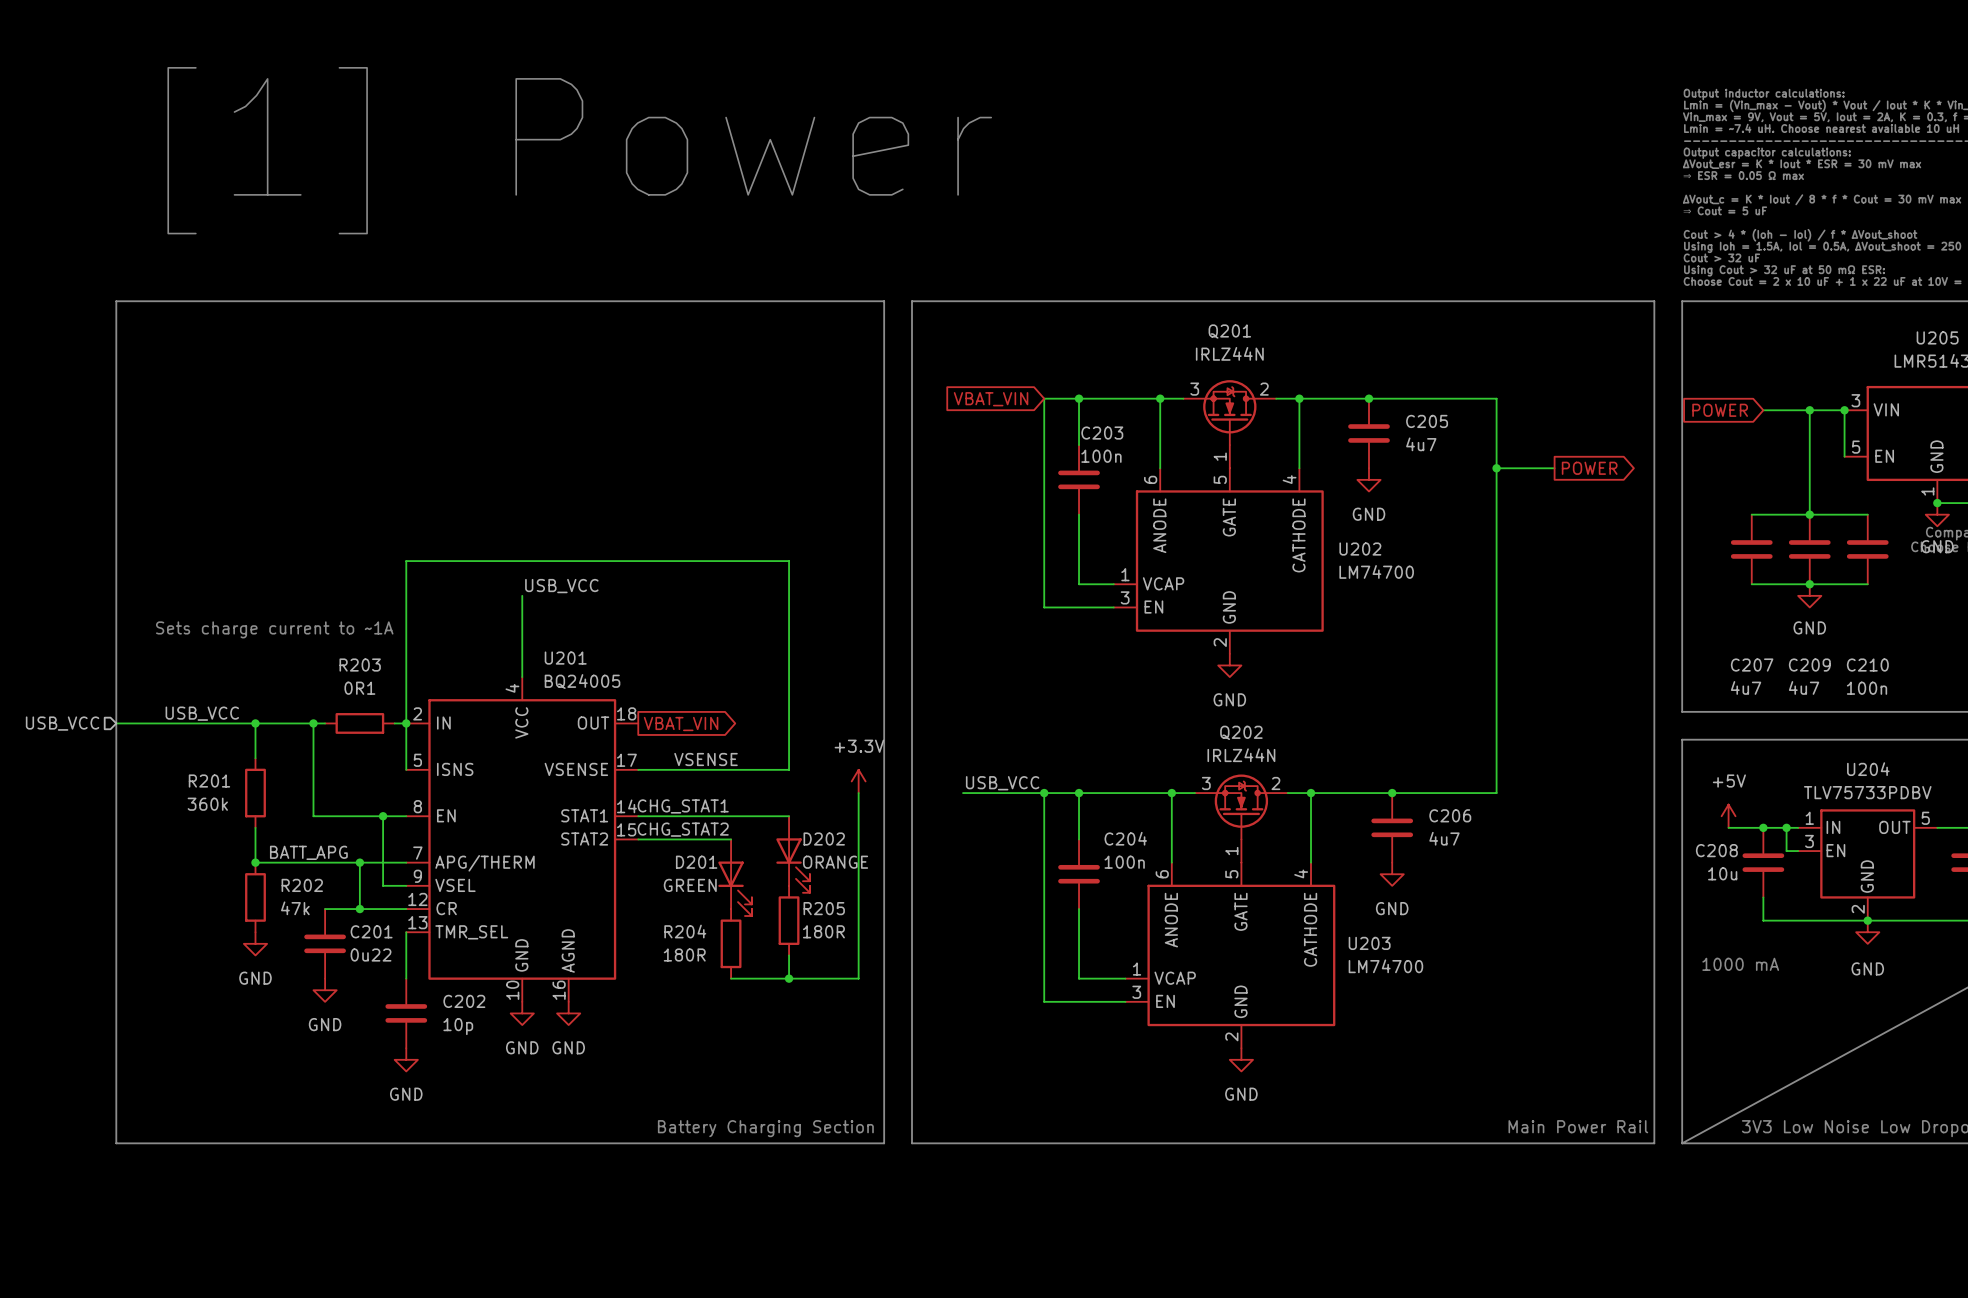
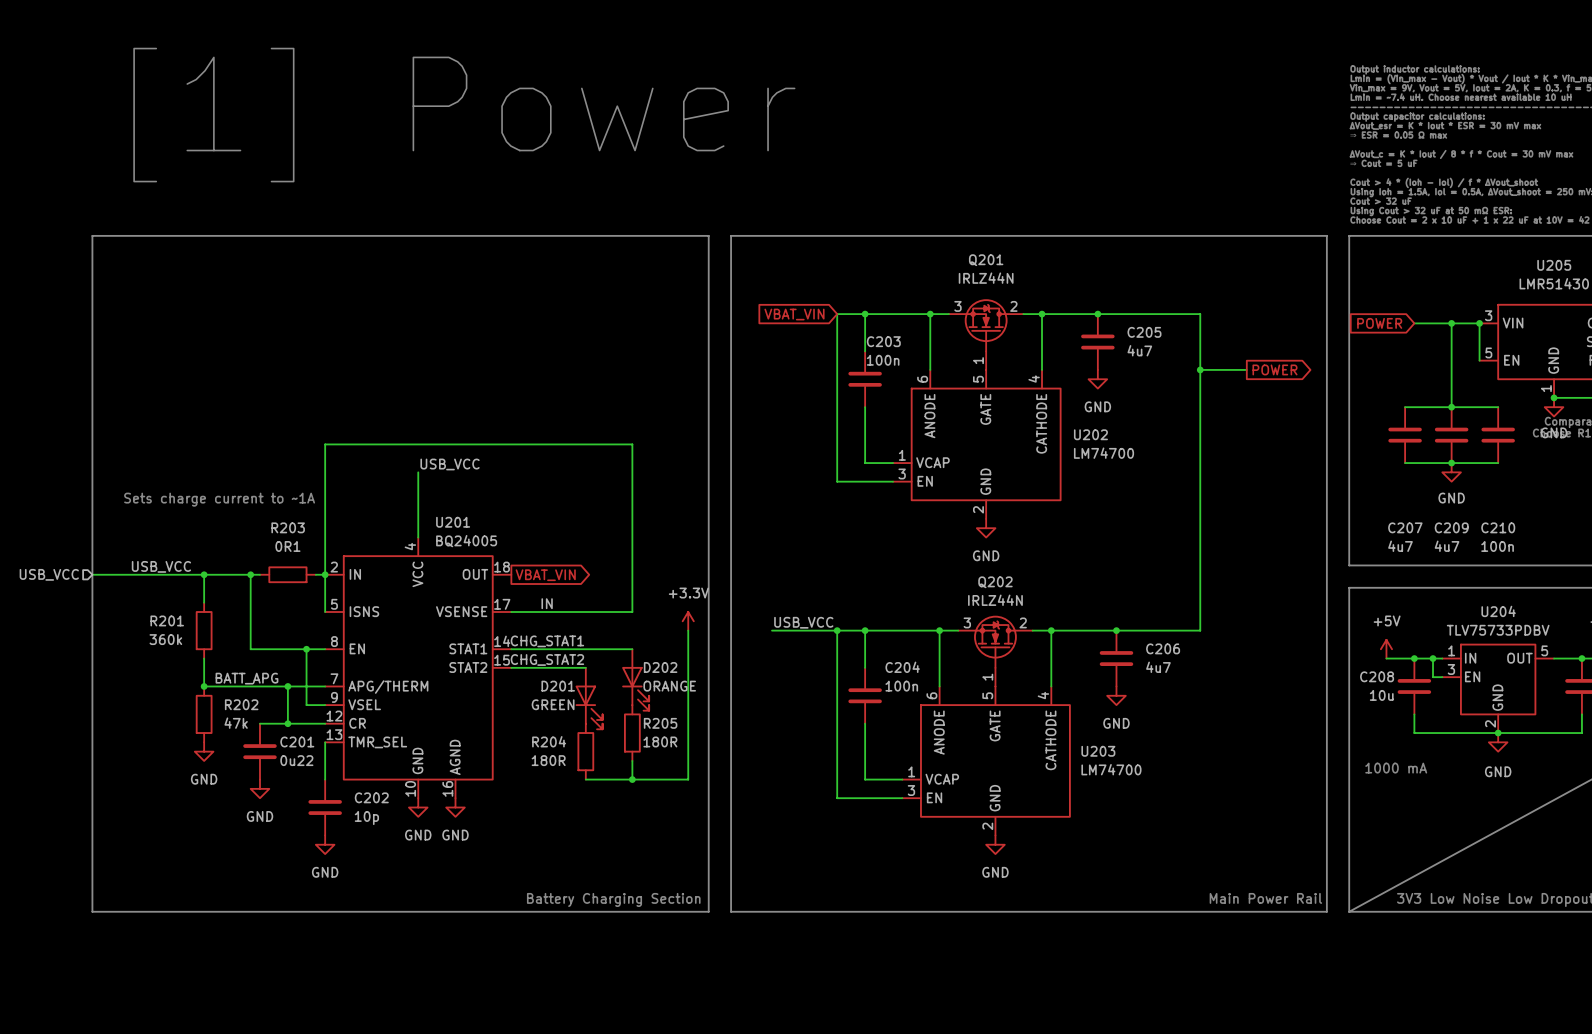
label: VSENSE (706, 759) -> IN (547, 603)

